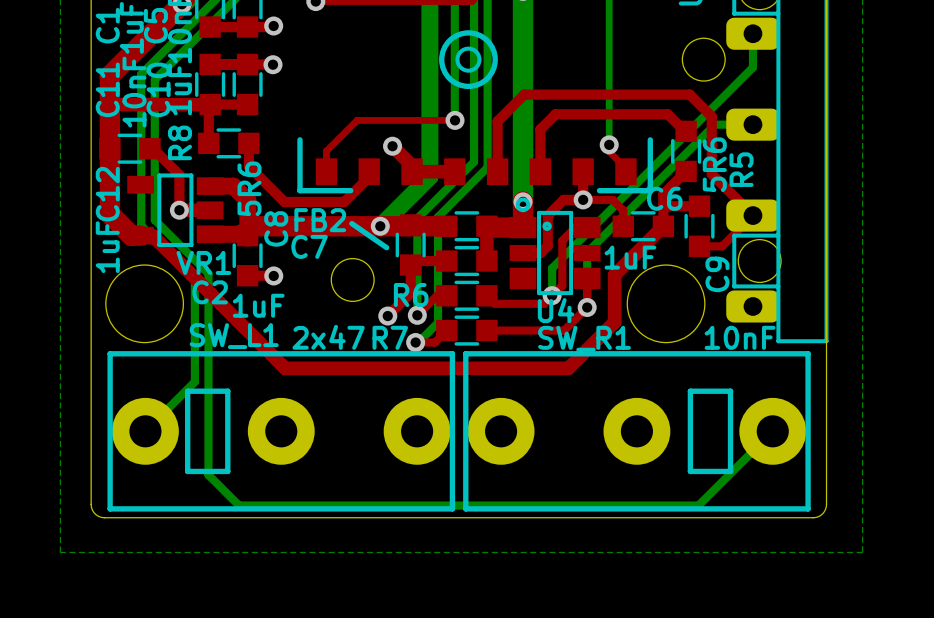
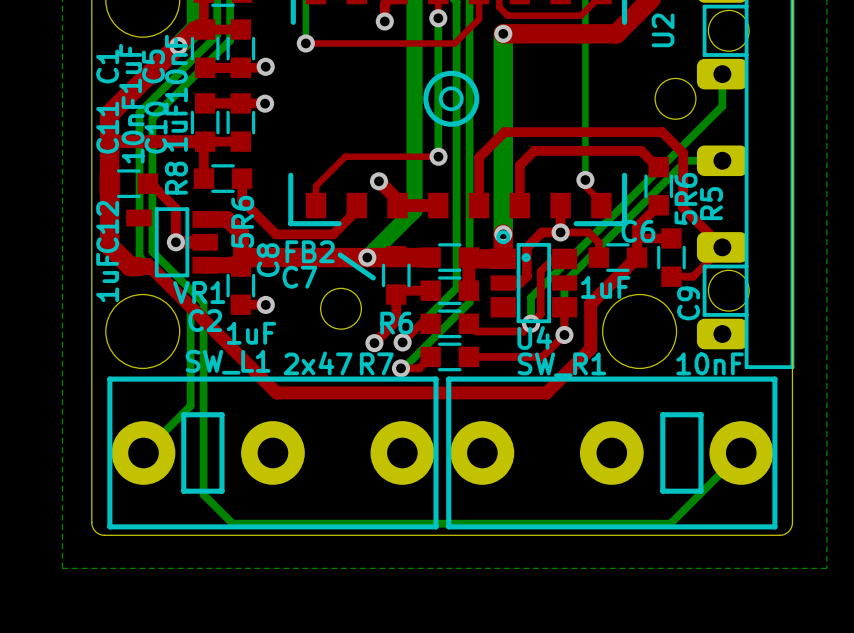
bottom track: (474, 161) (417, 218) (417, 314) -> (456, 196) (456, 288) (402, 342)
bottom track: (487, 167) (438, 217) (438, 322) -> (469, 201) (469, 302) (422, 349)

